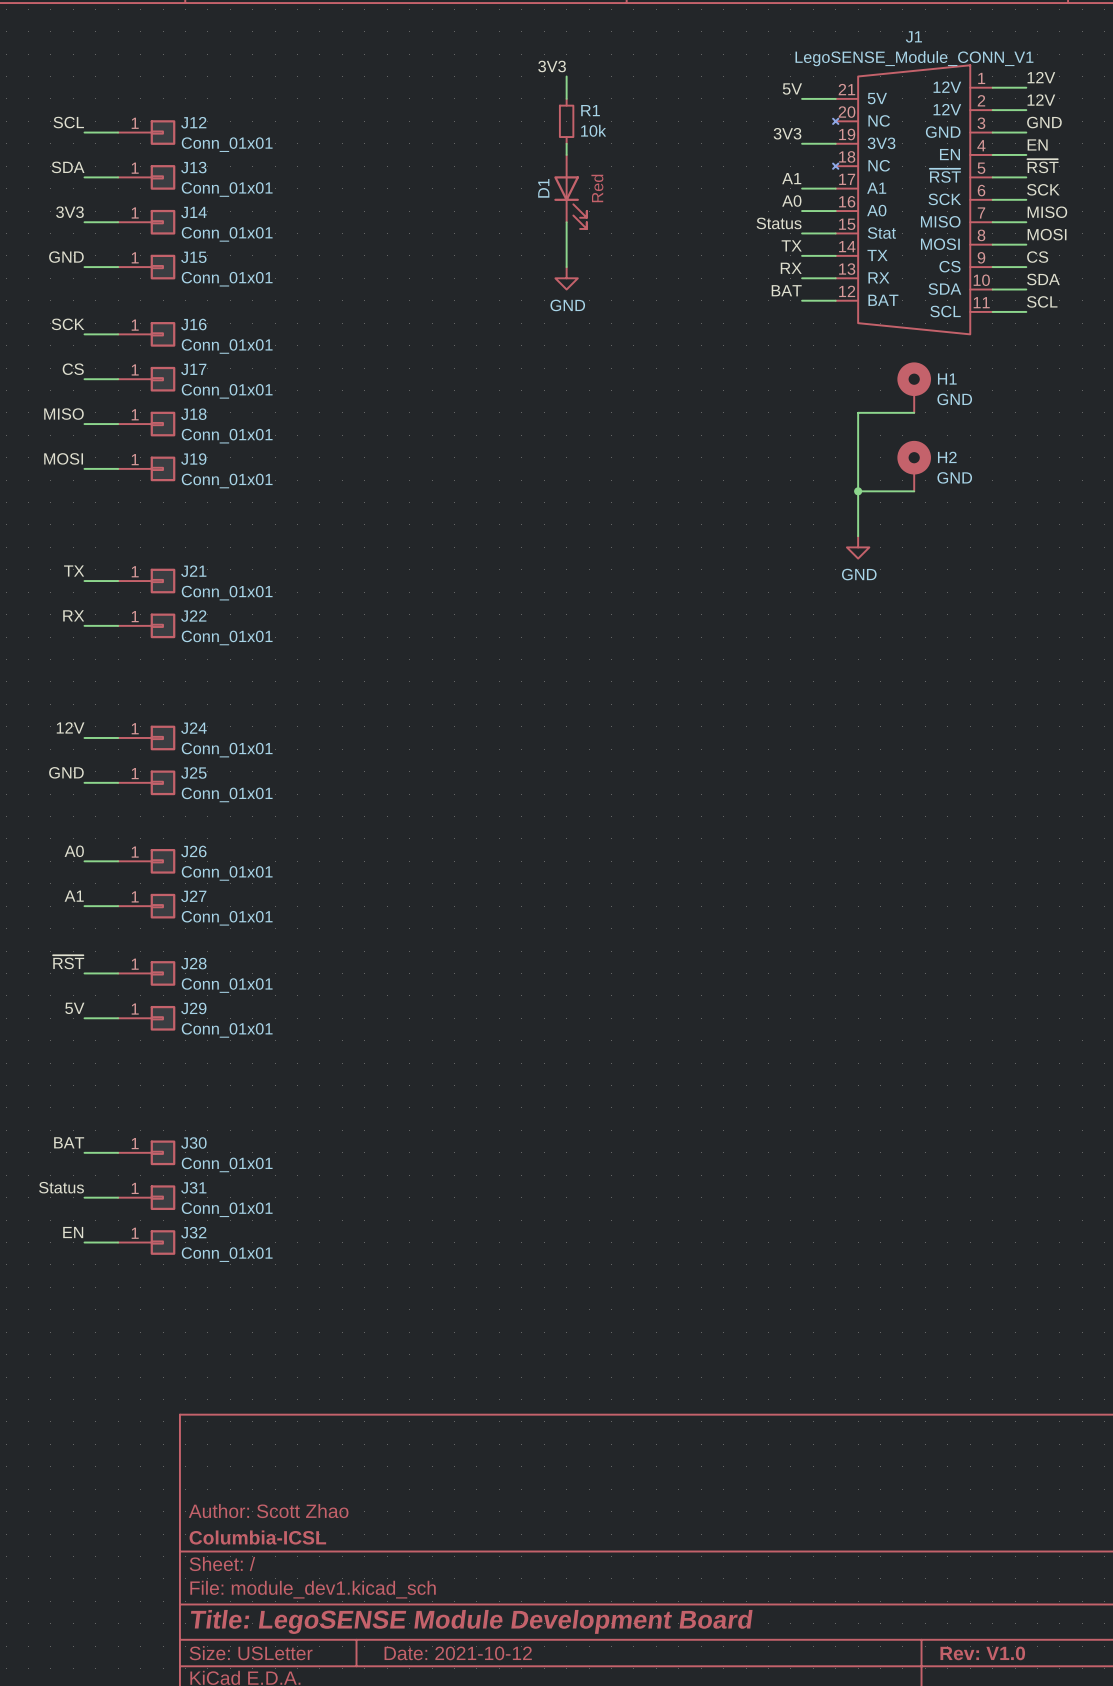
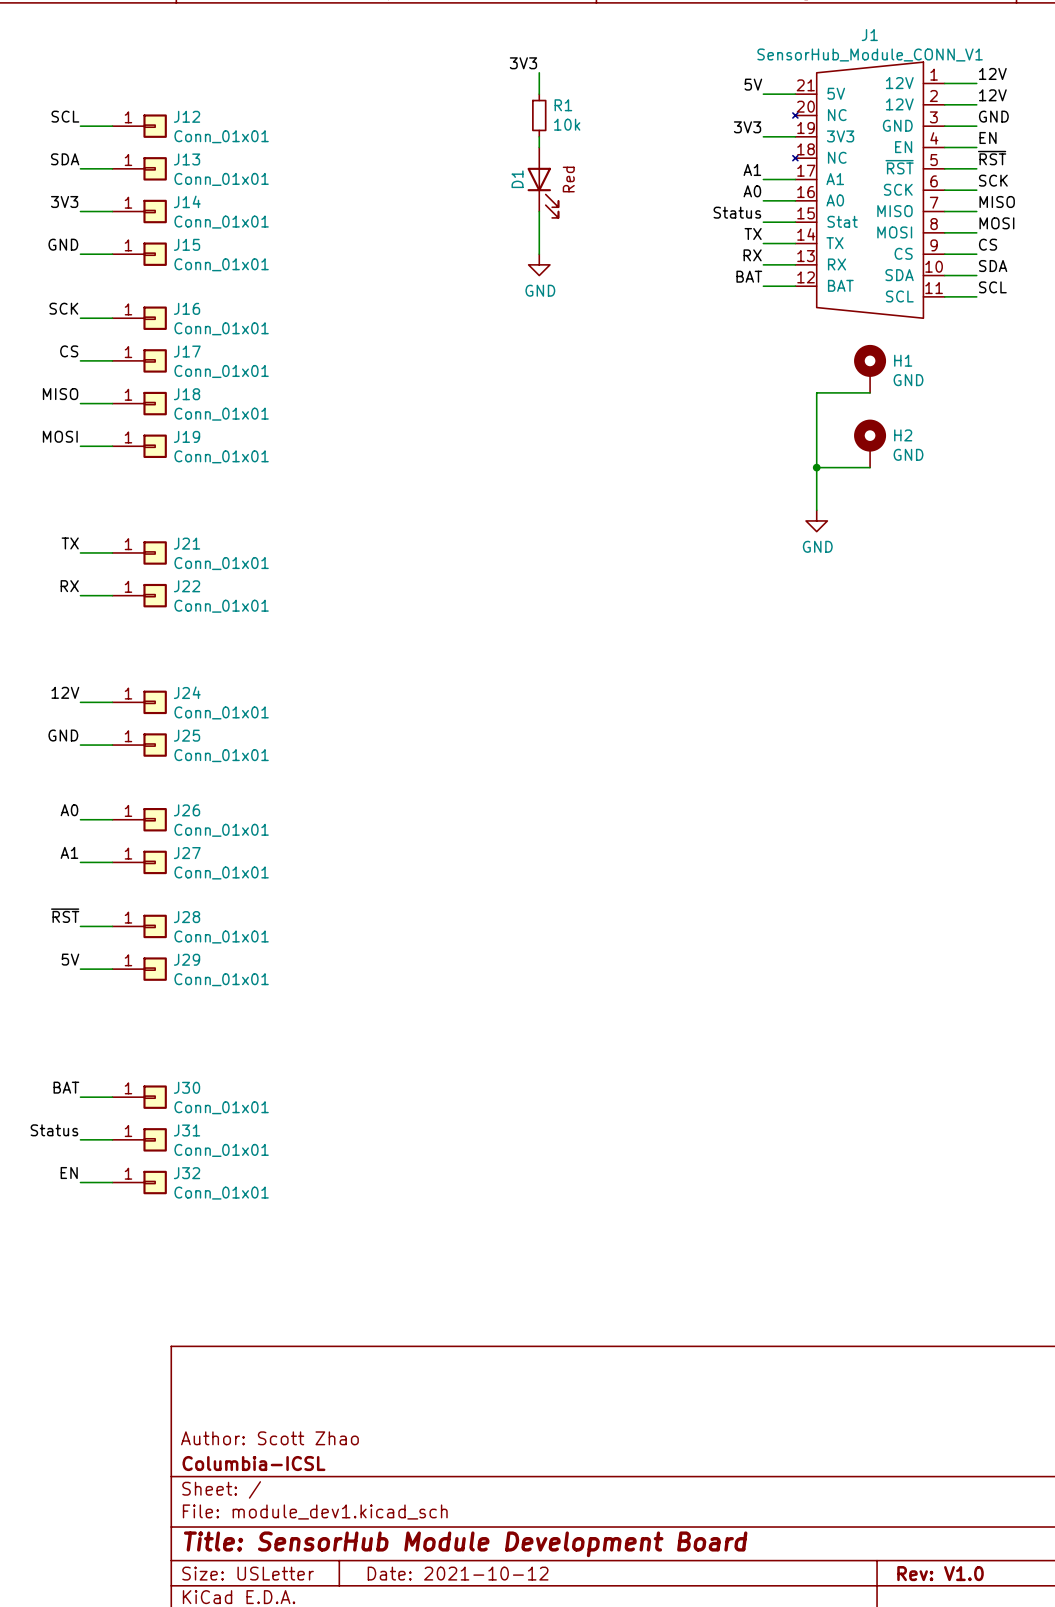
J1 value: LegoSENSE_Module_CONN_V1 (914, 58) -> SensorHub_Module_CONN_V1 (870, 54)
title block: Title: LegoSENSE Module Development Board (471, 1621) -> Title: SensorHub Module Development Board (465, 1544)

